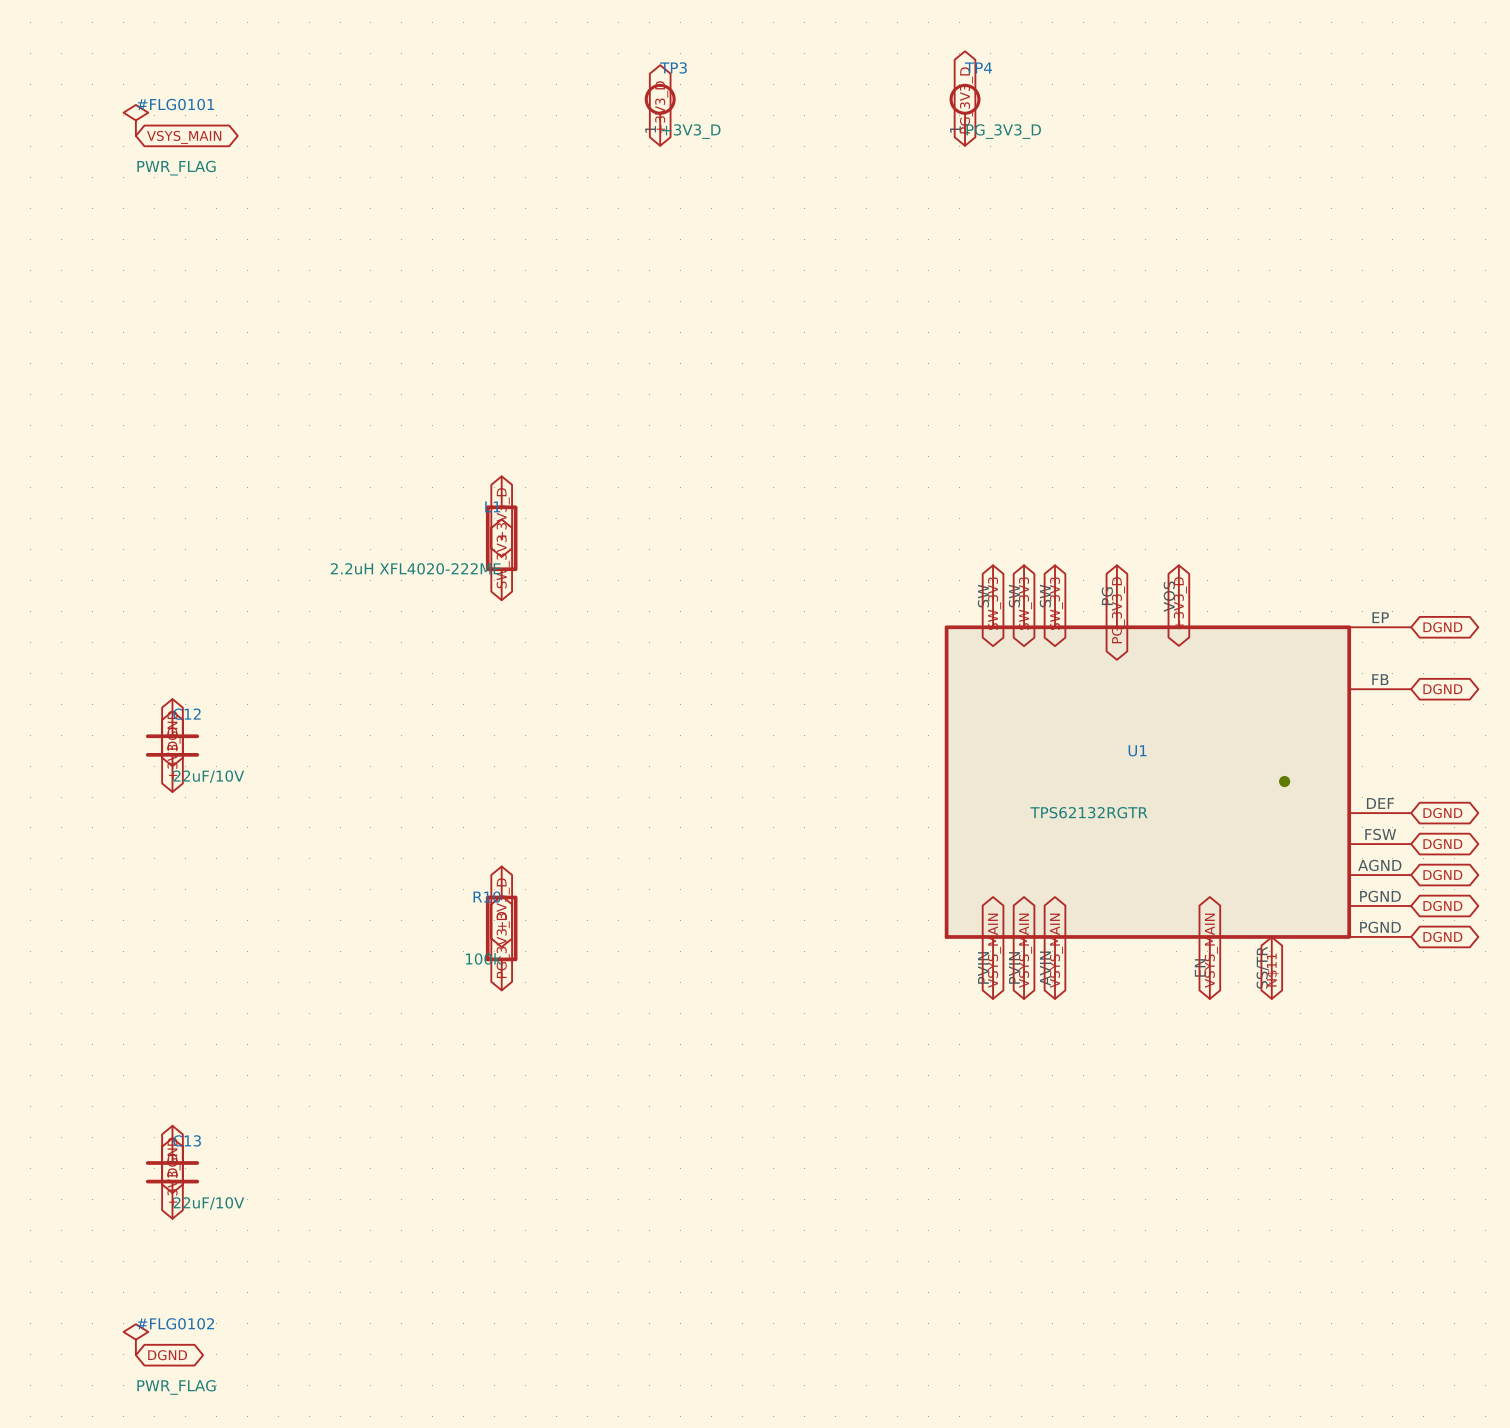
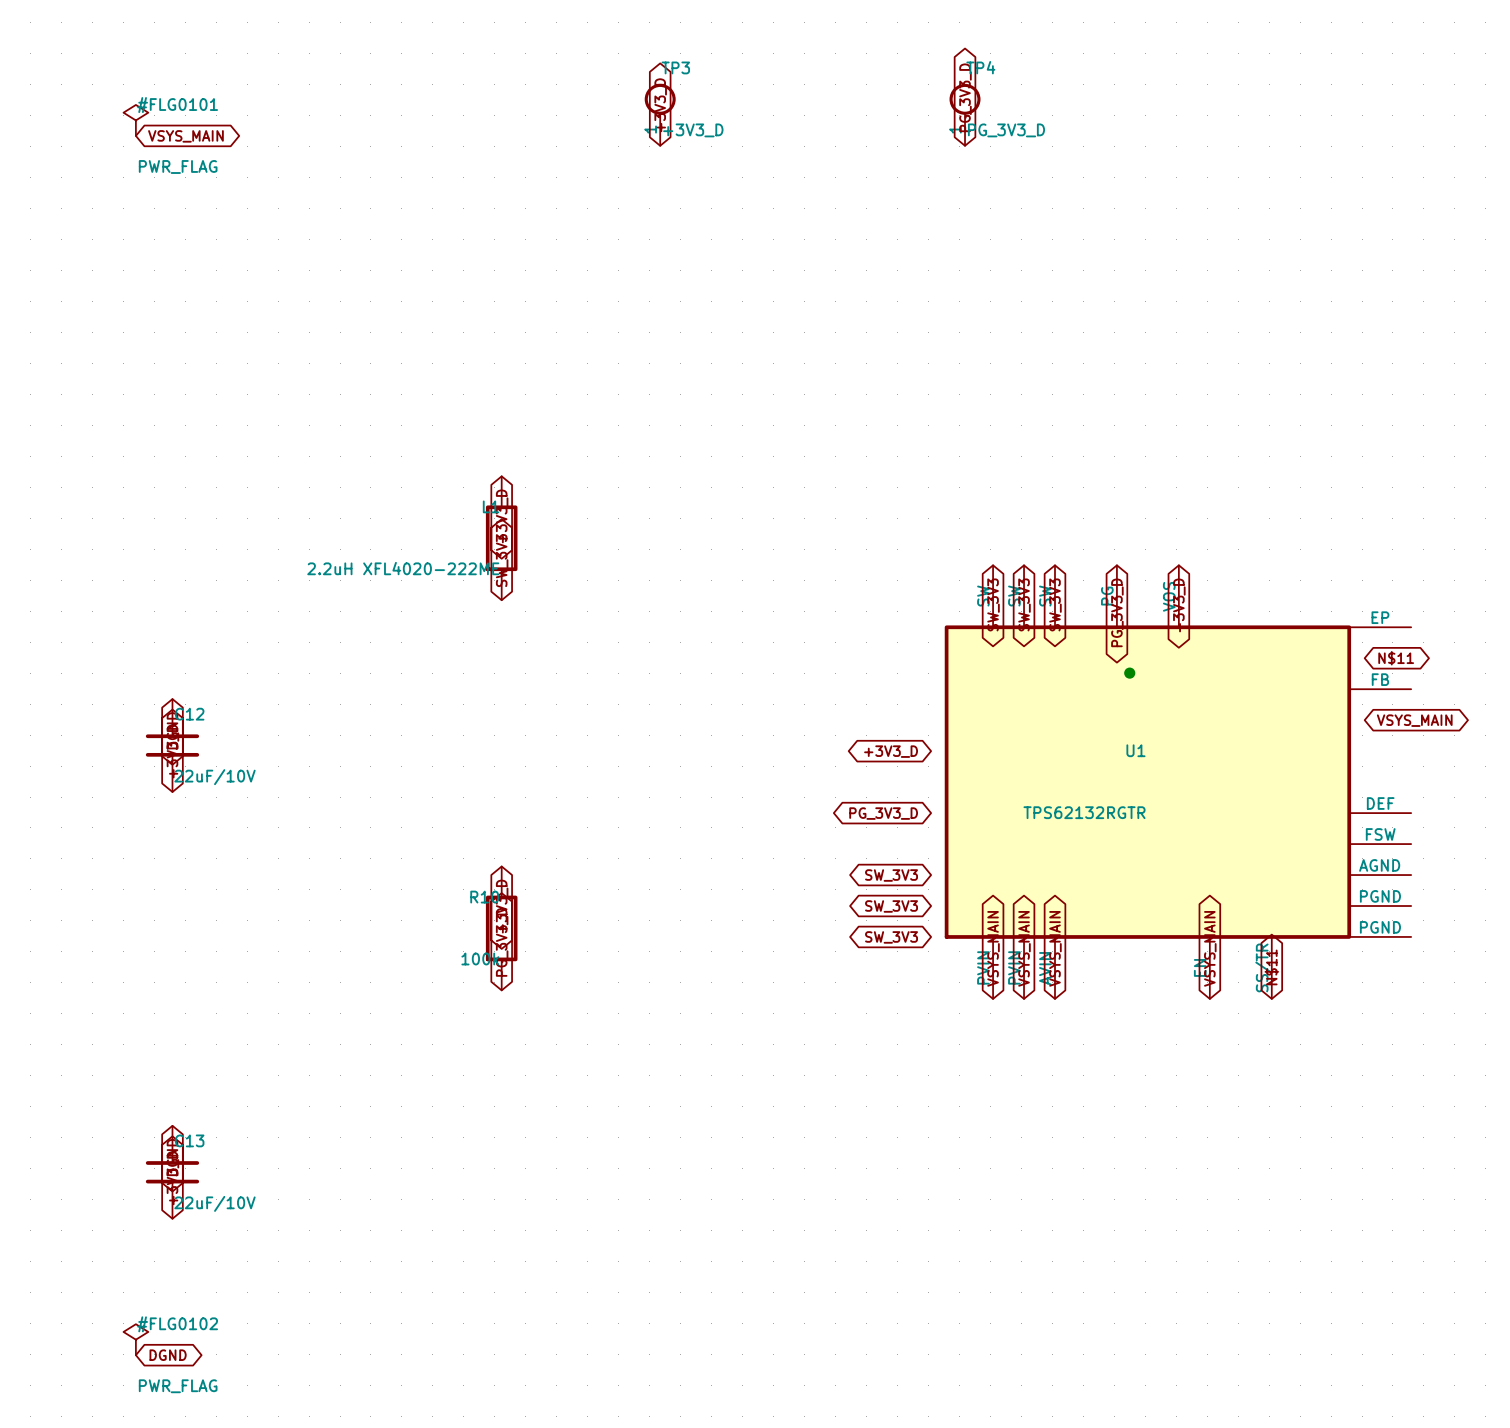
global label: DGND (1442, 627) -> none
global label: none -> N$11 (1396, 658)
junction: none -> (1129, 673)
global label: DGND (1442, 689) -> none
global label: none -> VSYS_MAIN (1414, 720)
global label: none -> +3V3_D (891, 751)
junction: (1284, 781) -> none
global label: DGND (1442, 813) -> none
global label: none -> PG_3V3_D (883, 813)
global label: DGND (1442, 844) -> none
global label: DGND (1442, 875) -> none
global label: none -> SW_3V3 (891, 875)
global label: DGND (1442, 906) -> none
global label: none -> SW_3V3 (891, 906)
global label: DGND (1442, 936) -> none
global label: none -> SW_3V3 (891, 937)

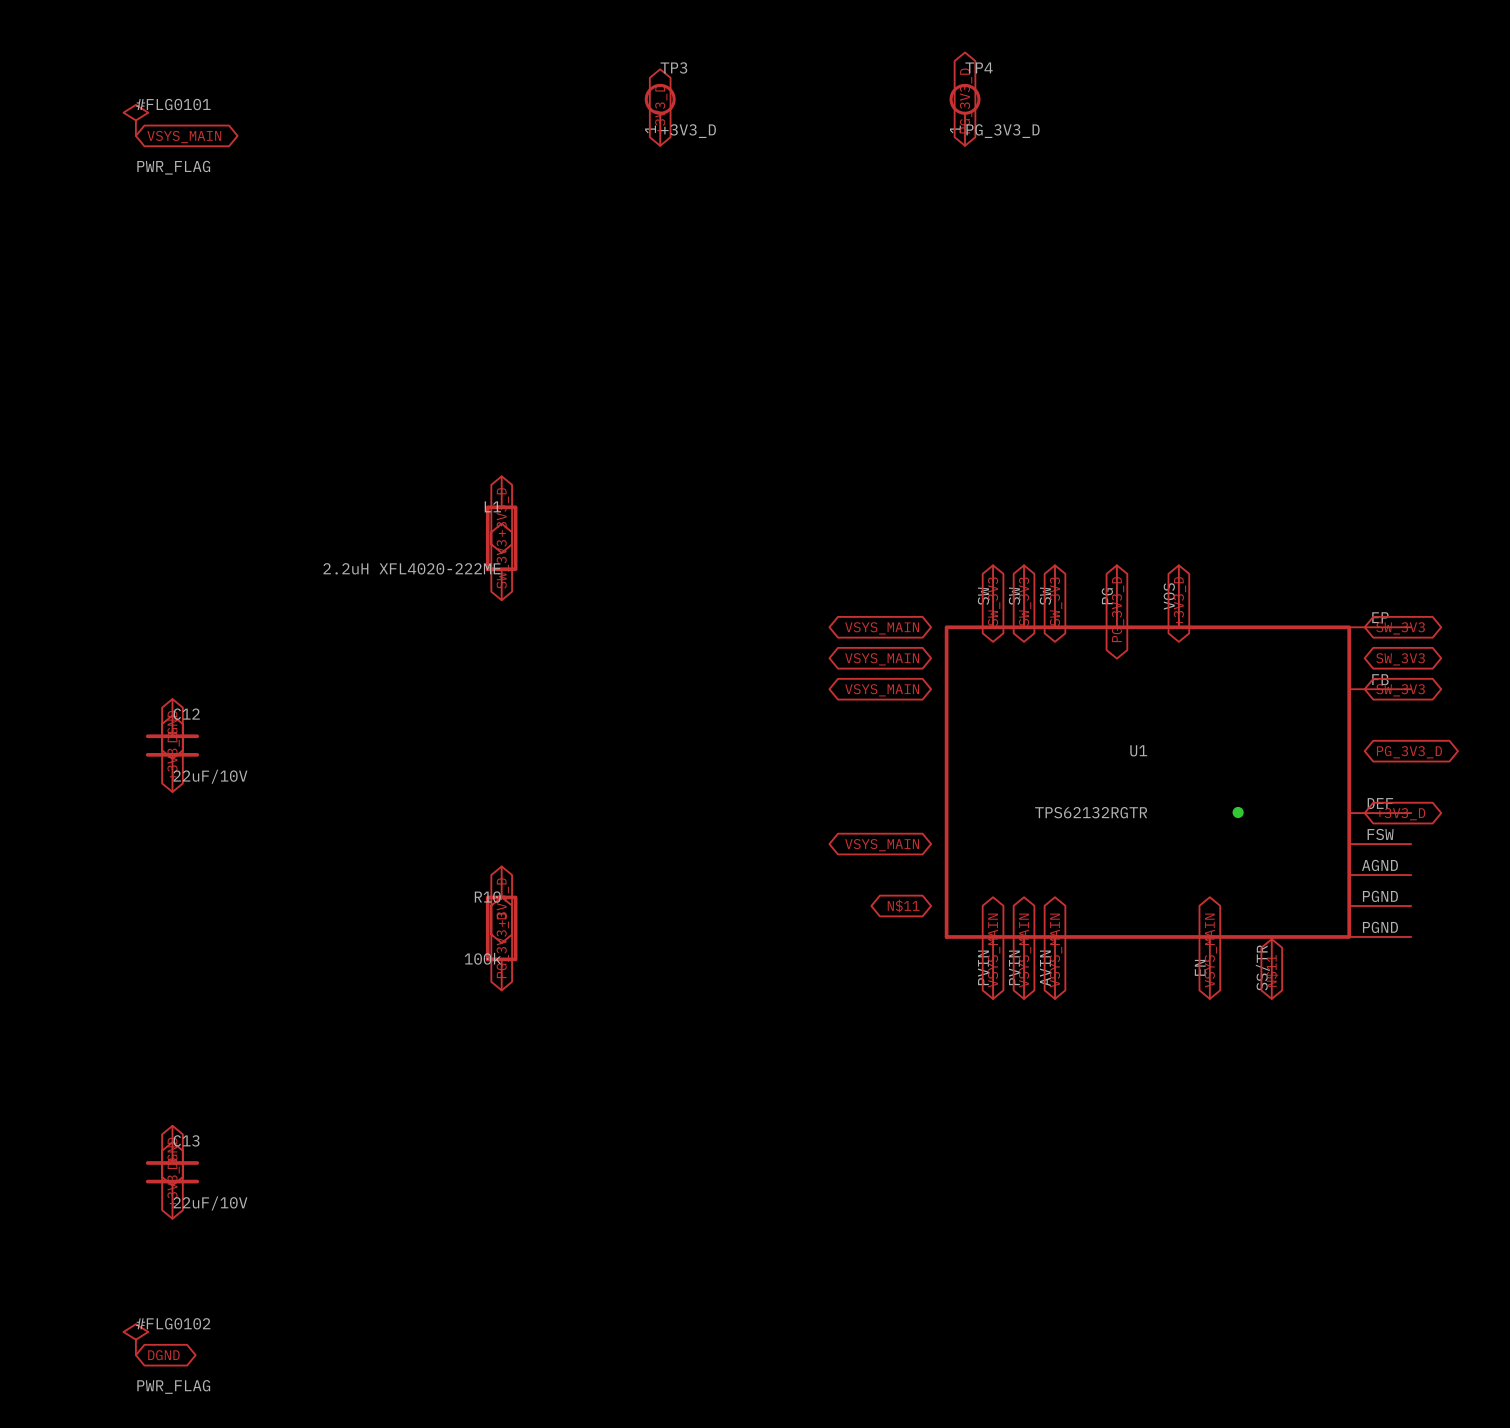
global label: none -> VSYS_MAIN (882, 628)
global label: none -> SW_3V3 (1400, 628)
global label: none -> VSYS_MAIN (882, 659)
global label: N$11 (1396, 658) -> SW_3V3 (1400, 659)
junction: (1129, 673) -> none
global label: none -> VSYS_MAIN (882, 690)
global label: none -> SW_3V3 (1400, 690)
global label: VSYS_MAIN (1414, 720) -> none
global label: +3V3_D (891, 751) -> none
global label: none -> PG_3V3_D (1409, 752)
junction: none -> (1238, 812)
global label: PG_3V3_D (883, 813) -> none
global label: none -> +3V3_D (1400, 814)
global label: none -> VSYS_MAIN (882, 845)
global label: SW_3V3 (891, 875) -> none
global label: SW_3V3 (891, 906) -> N$11 (903, 906)
global label: SW_3V3 (891, 937) -> none

